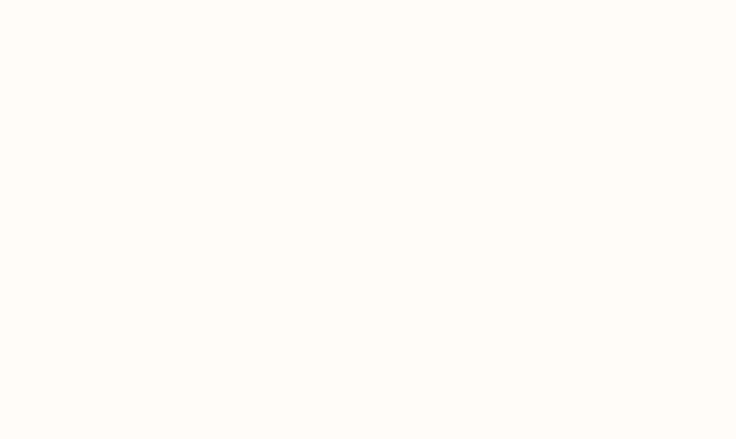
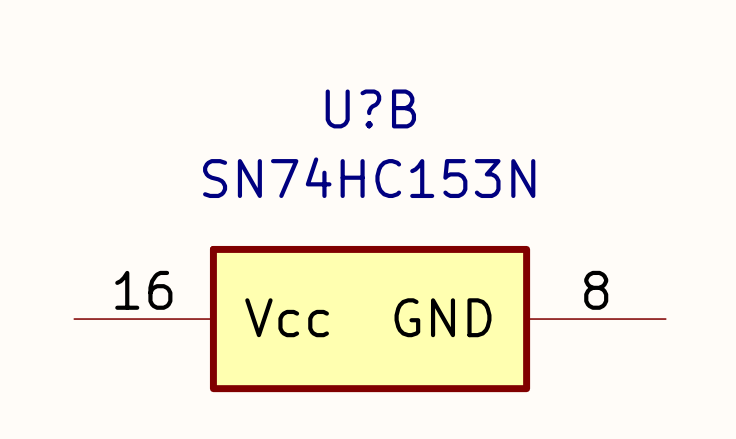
U?B: none -> SN74HC153N (370, 319)

